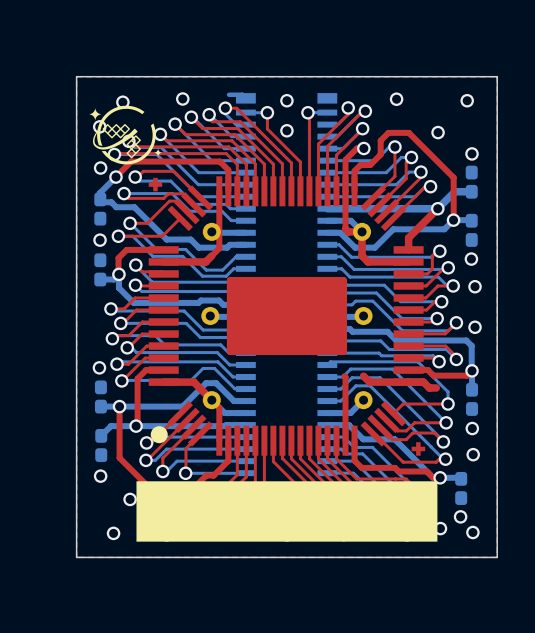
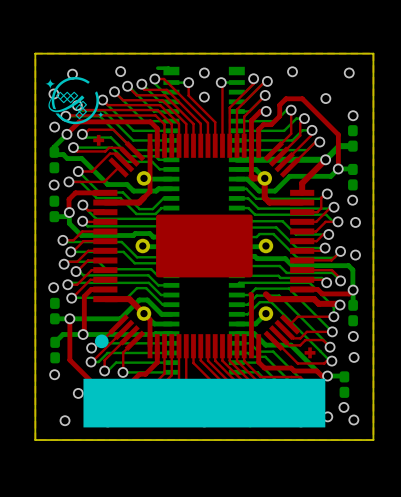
top track: none -> (324, 303) (340, 305)
via: none -> (340, 305)

